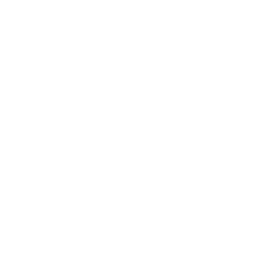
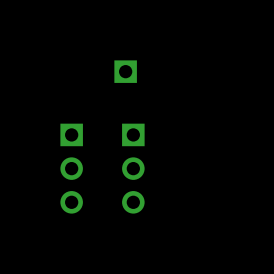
part: none -> (125, 71)
part: none -> (71, 168)
part: none -> (133, 168)

